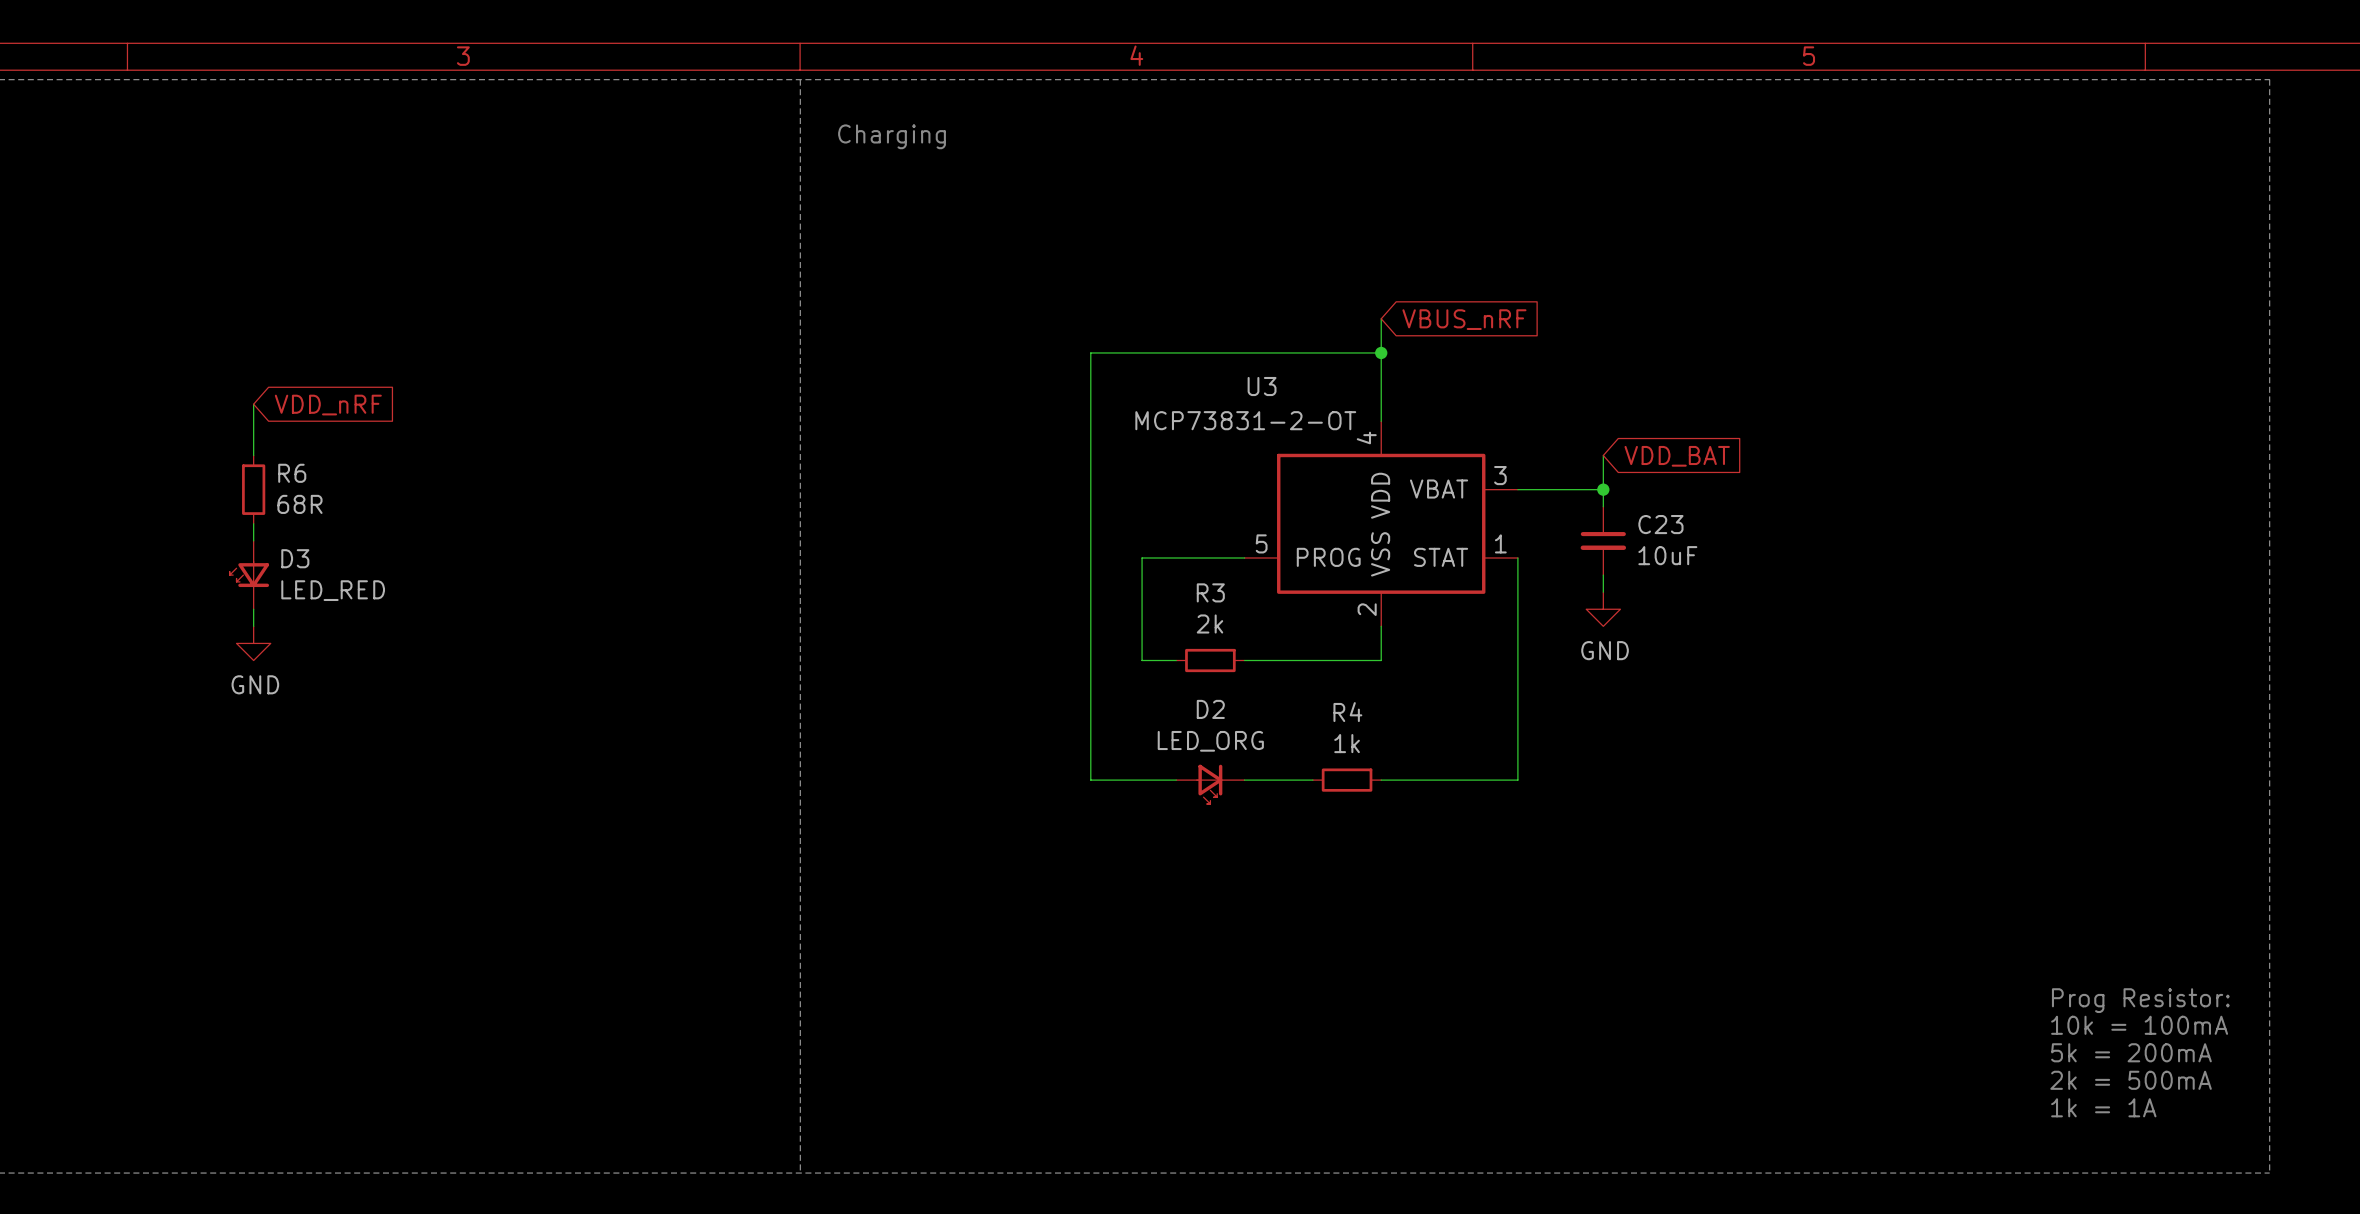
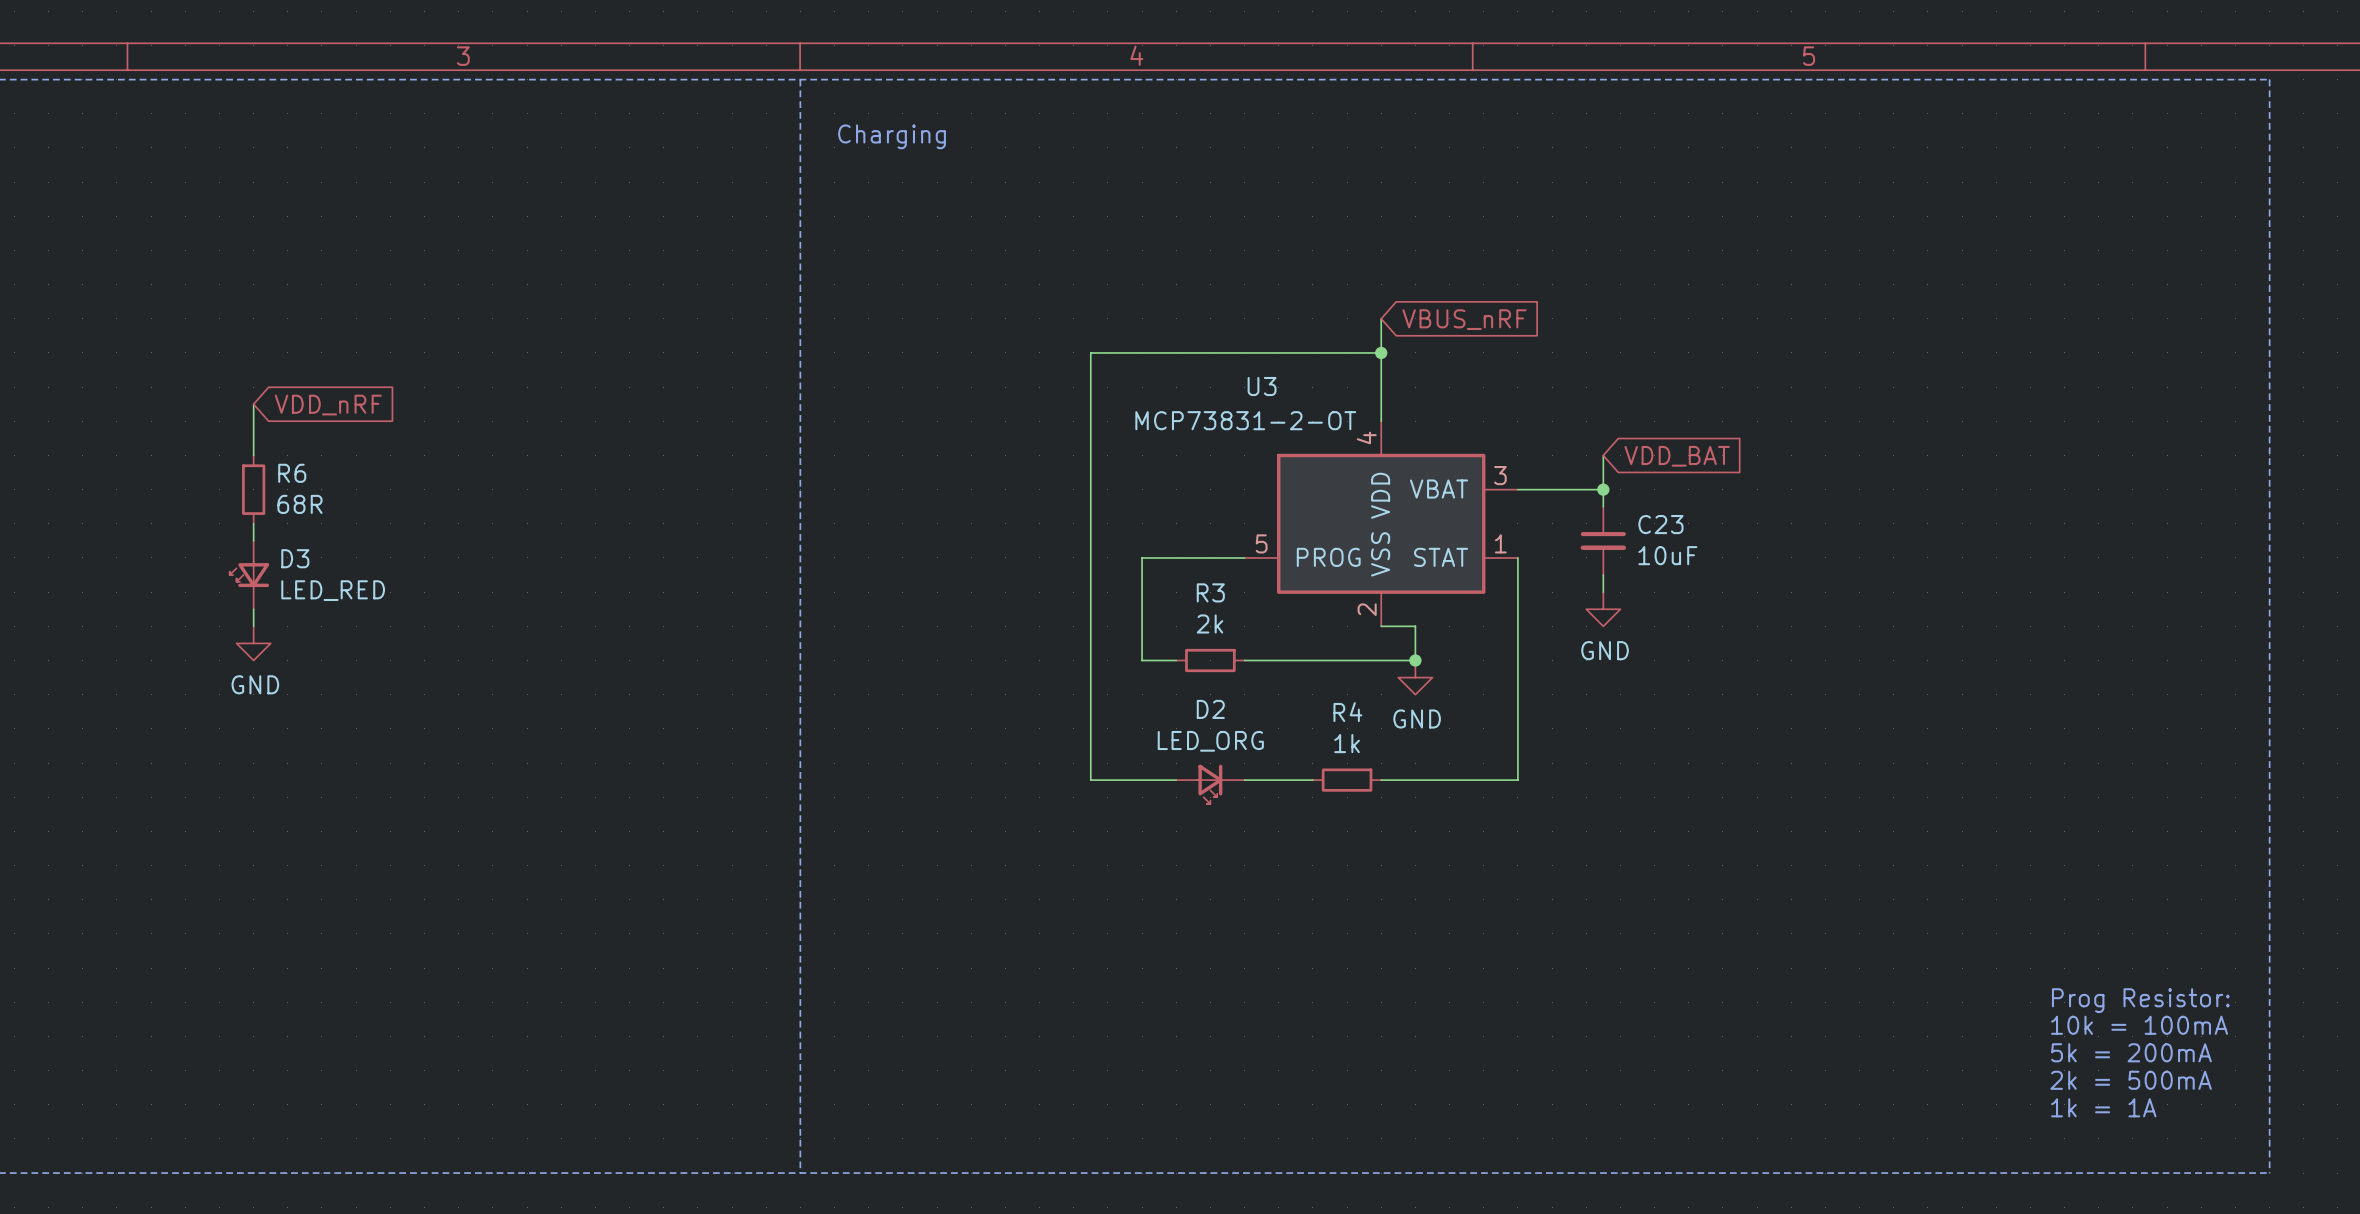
wire: (1381, 626) (1381, 660) -> (1381, 626) (1415, 626) (1415, 660) (1381, 660)
junction: none -> (1415, 660)
power symbol: none -> GND (1415, 677)

